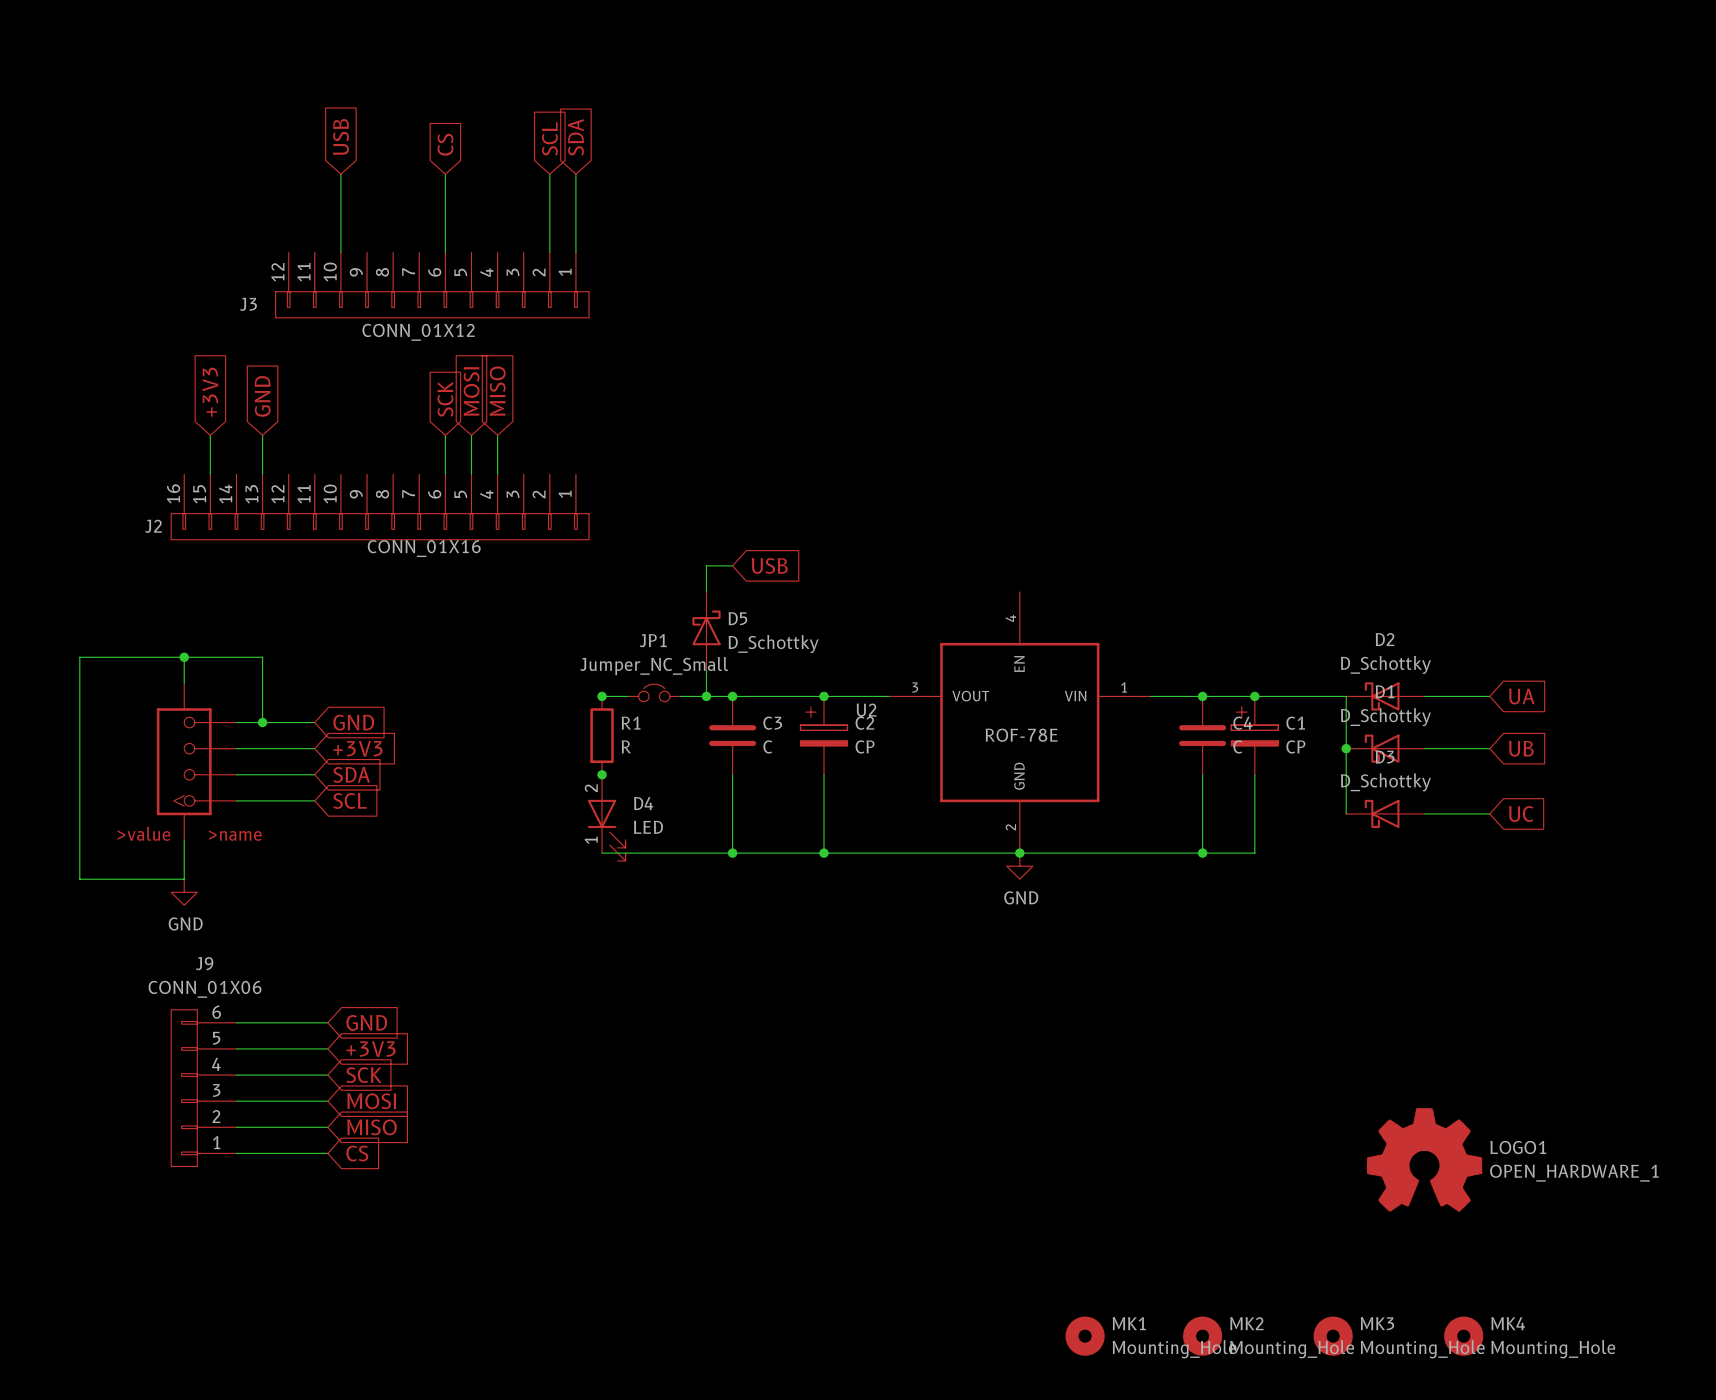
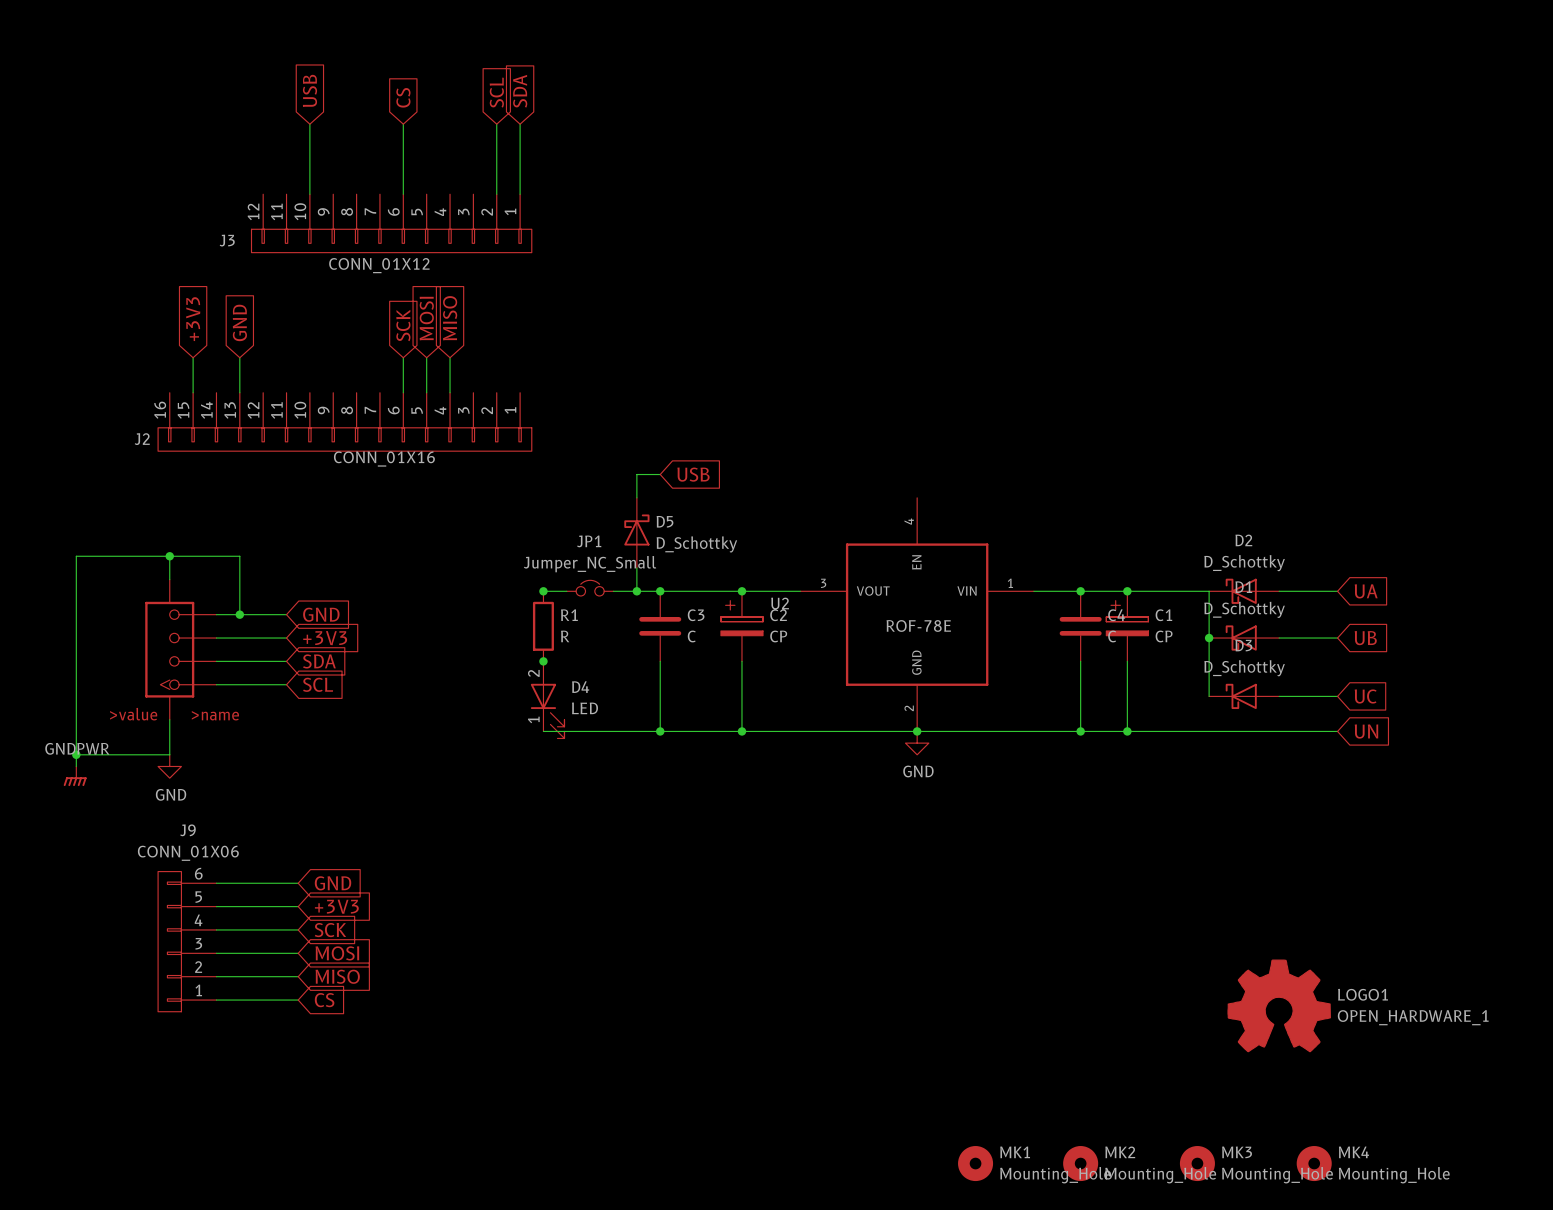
wire: none -> (1127, 731) (1337, 731)
junction: none -> (1127, 731)
global label: none -> UN (1366, 731)
wire: none -> (76, 754) (76, 766)
junction: none -> (76, 754)
power symbol: none -> GNDPWR (75, 776)

